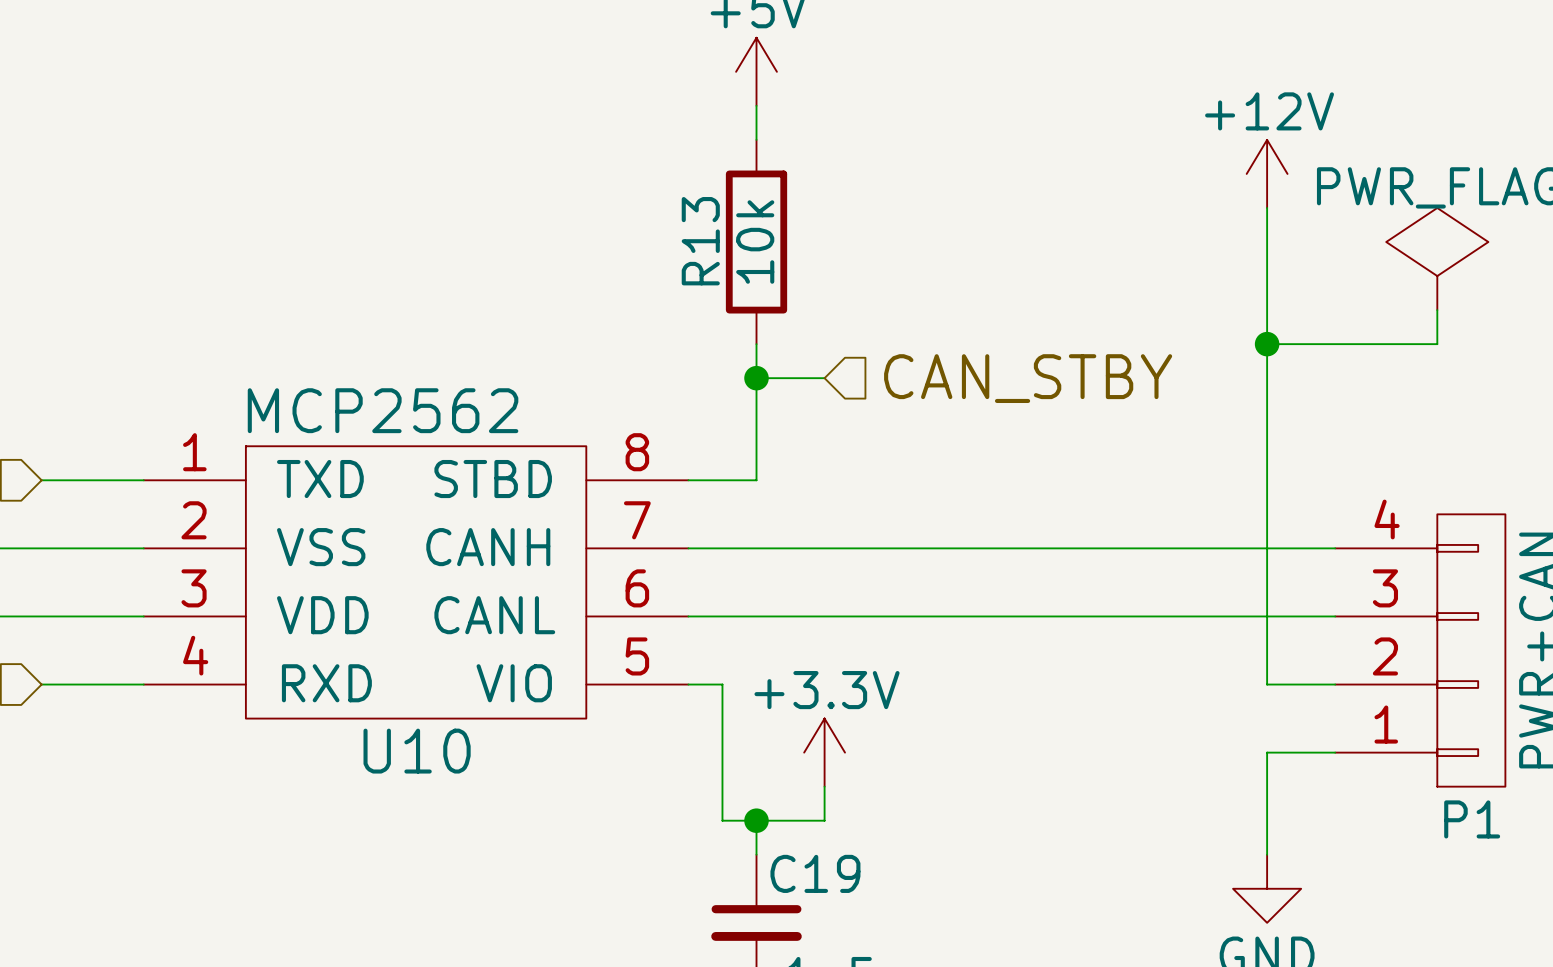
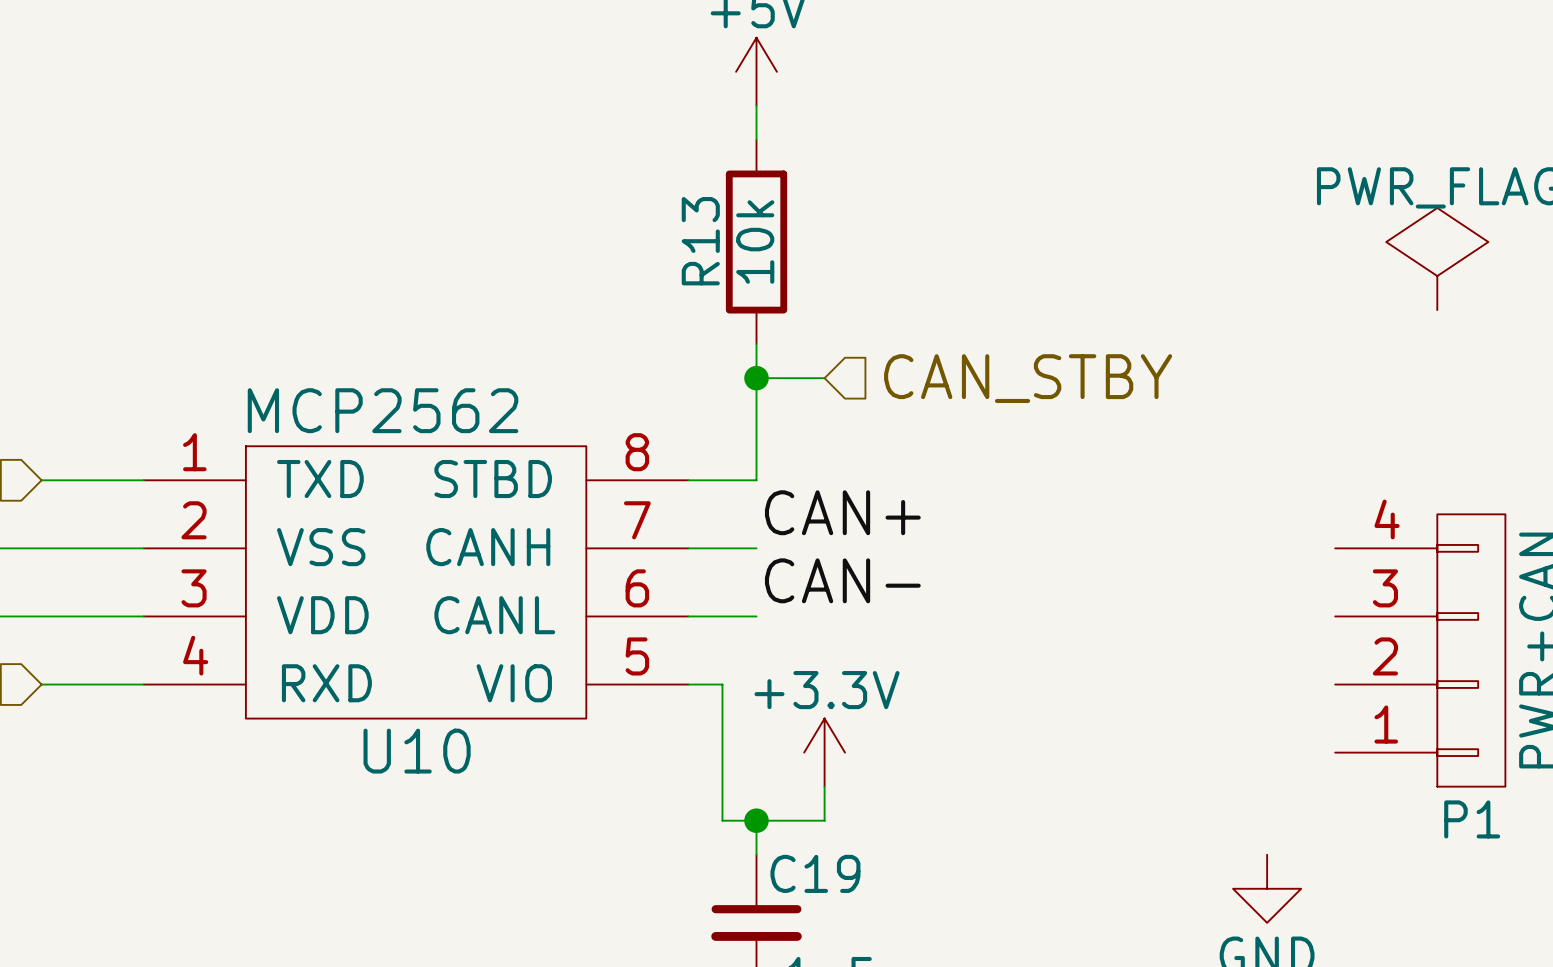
power symbol: +12V (1267, 173) -> none
wire: (1267, 207) (1267, 684) (1335, 684) -> none
wire: (1437, 310) (1437, 344) (1267, 344) -> none
junction: (1267, 344) -> none
label: none -> CAN+ (842, 512)
wire: (756, 548) (1335, 548) -> none
label: none -> CAN- (842, 580)
wire: (756, 616) (1335, 616) -> none
wire: (1335, 752) (1267, 752) (1267, 854) -> none

